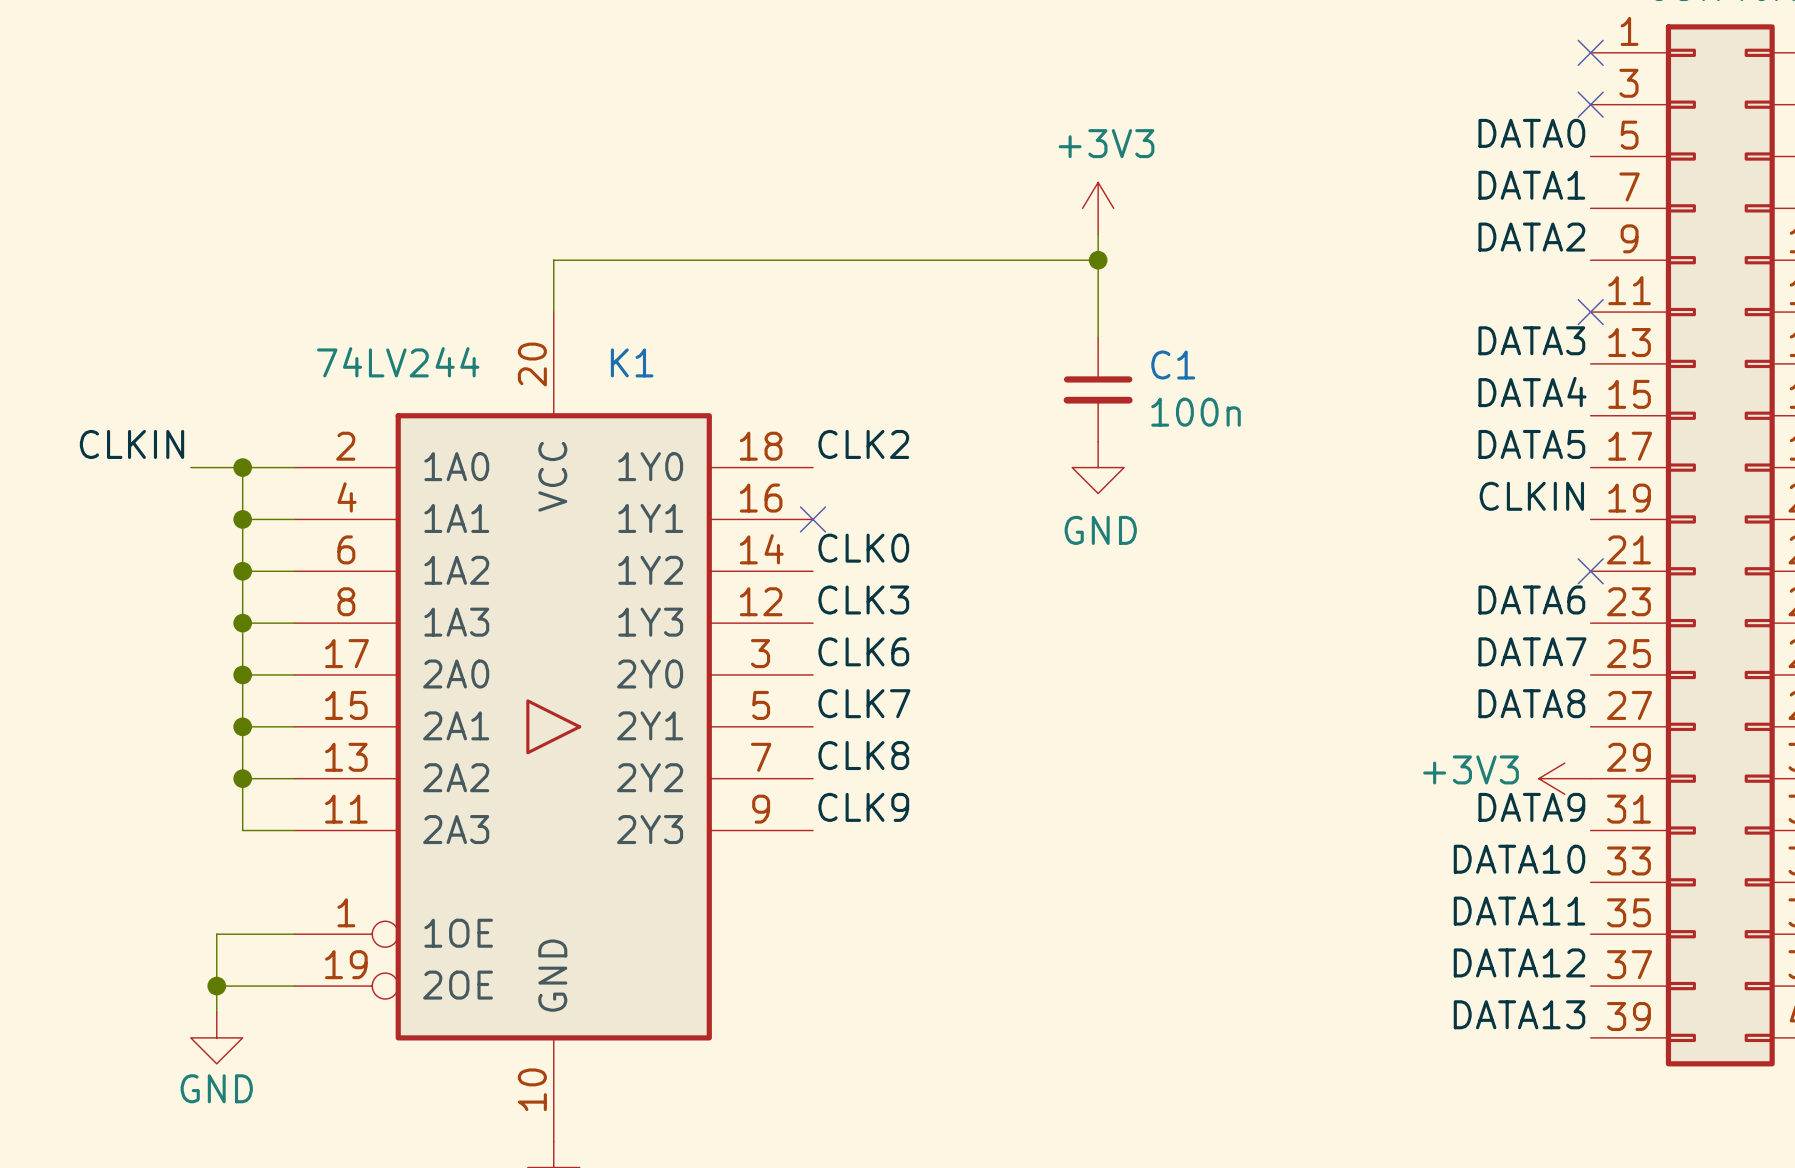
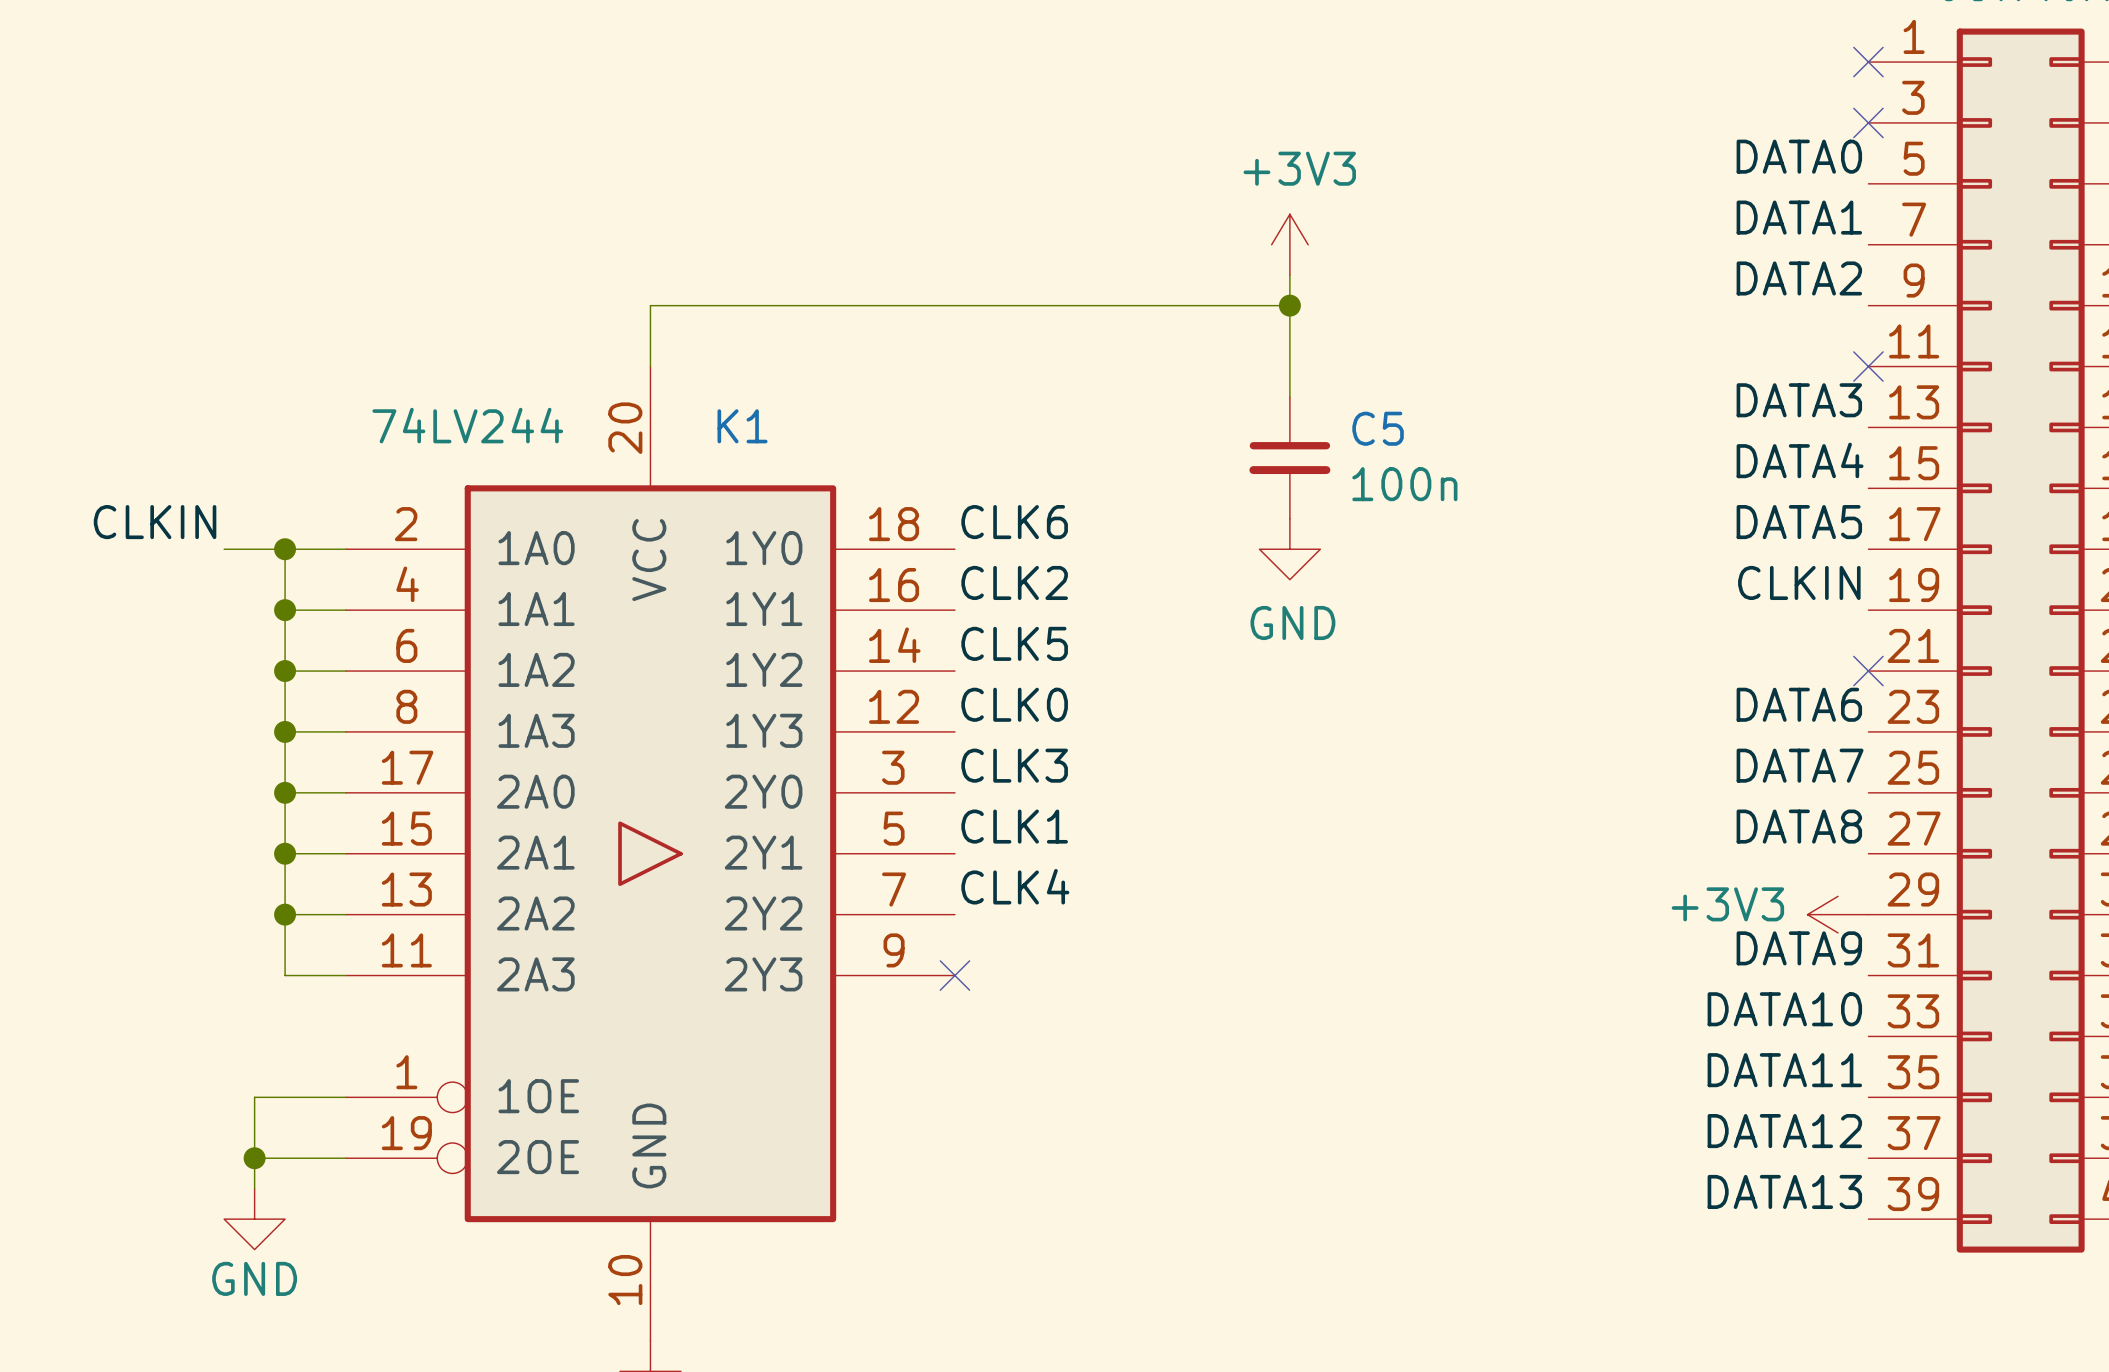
C1 name: C1 (1173, 365) -> C5 (1378, 428)
label: CLK2 (863, 444) -> CLK6 (1014, 522)
label: none -> CLK2 (1014, 582)
no-connect mark: (812, 519) -> none
label: CLK0 (863, 548) -> CLK5 (1014, 643)
label: CLK3 (863, 600) -> CLK0 (1014, 704)
label: CLK6 (863, 651) -> CLK3 (1014, 765)
label: CLK7 (864, 703) -> CLK1 (1014, 826)
label: CLK8 (863, 755) -> CLK4 (1015, 886)
label: CLK9 (863, 807) -> none
no-connect mark: none -> (954, 975)

